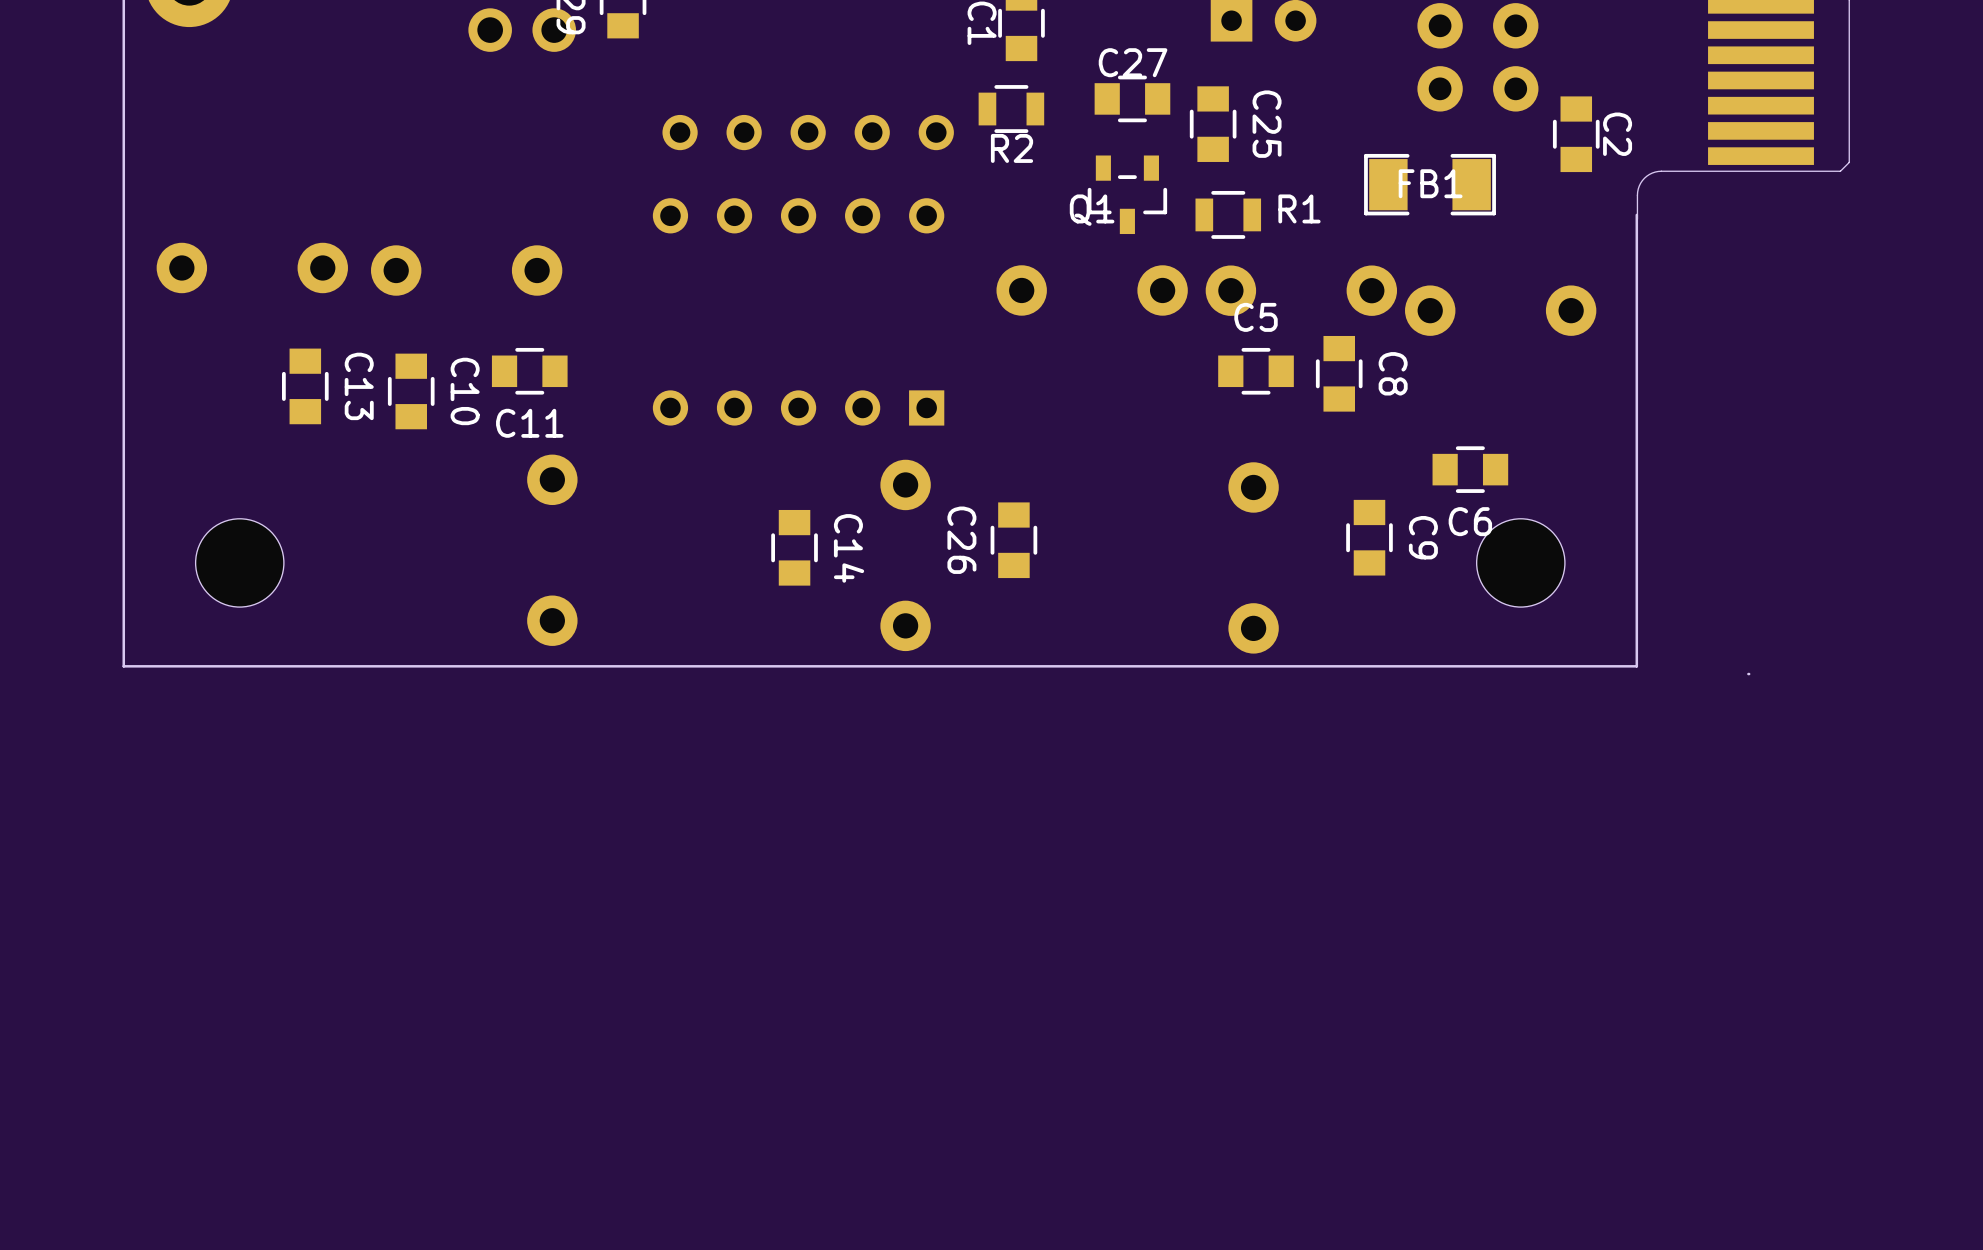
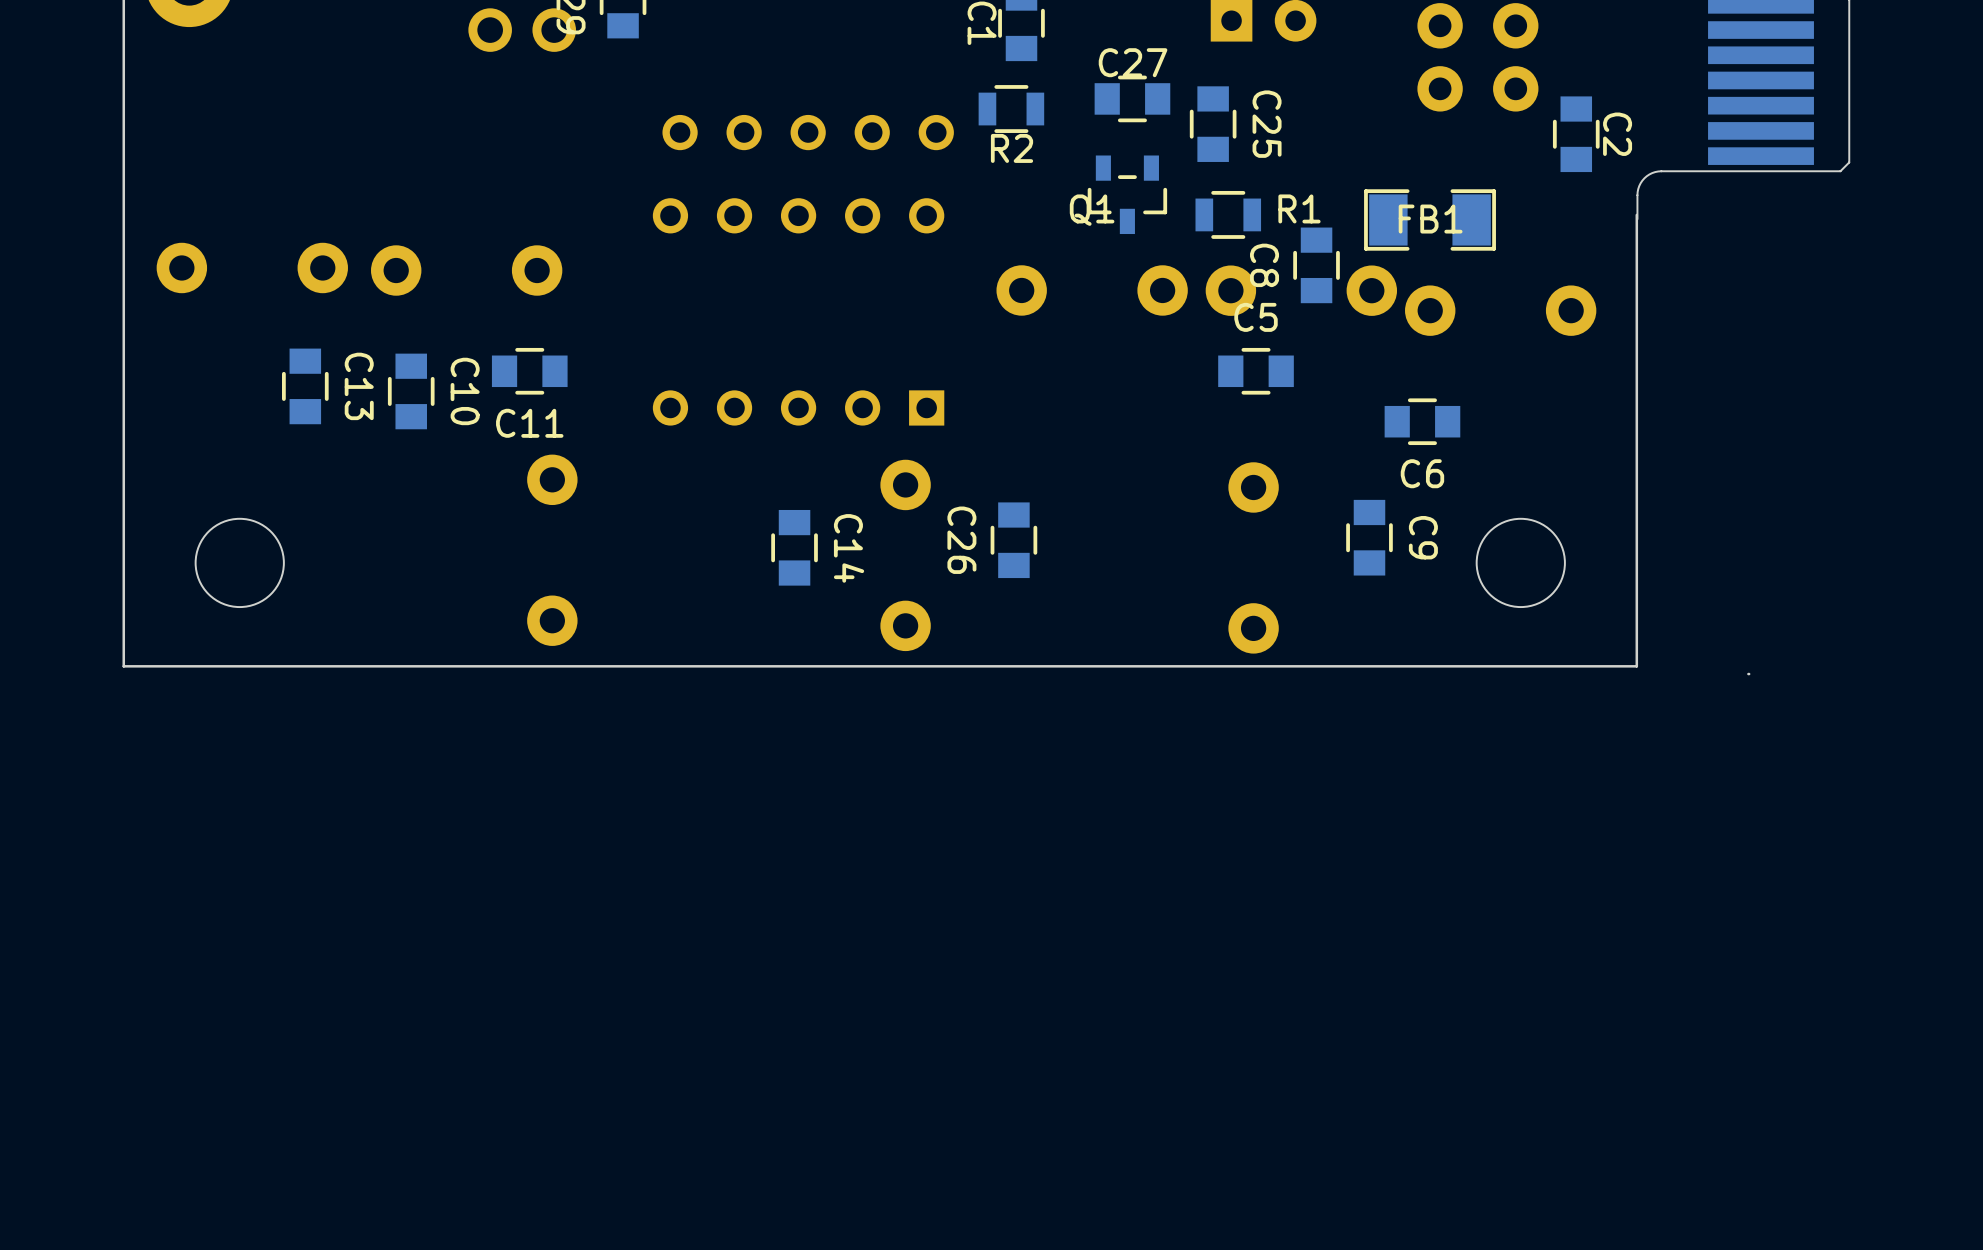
FB1 position: (1430, 184) -> (1430, 219)
C8 position: (1339, 373) -> (1316, 265)
C8 name position: C8 (1393, 373) -> C8 (1264, 265)
C6 position: (1470, 469) -> (1422, 421)

